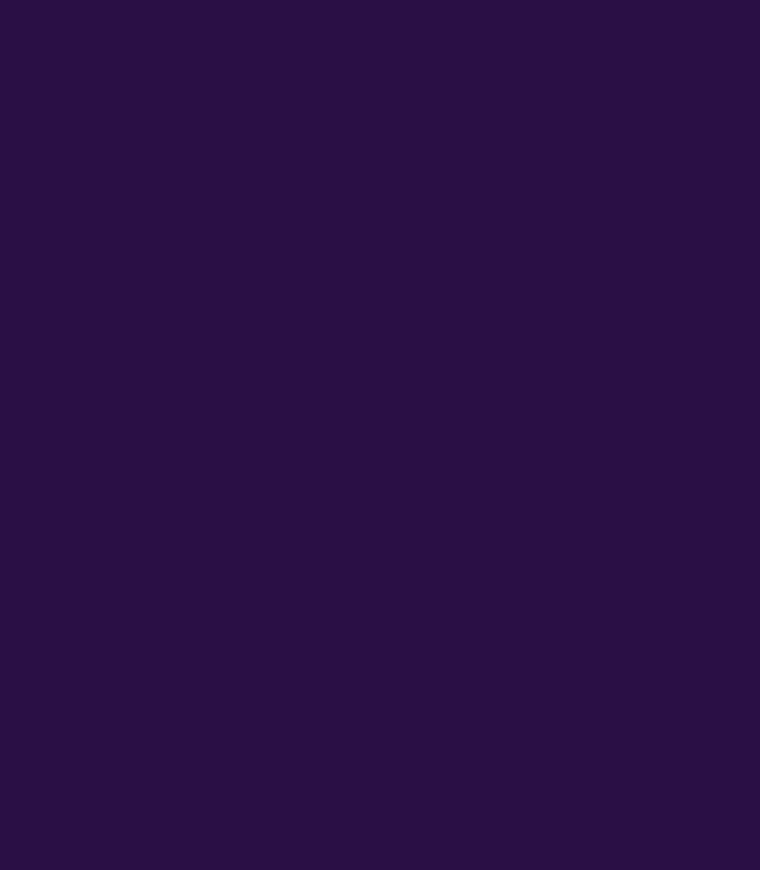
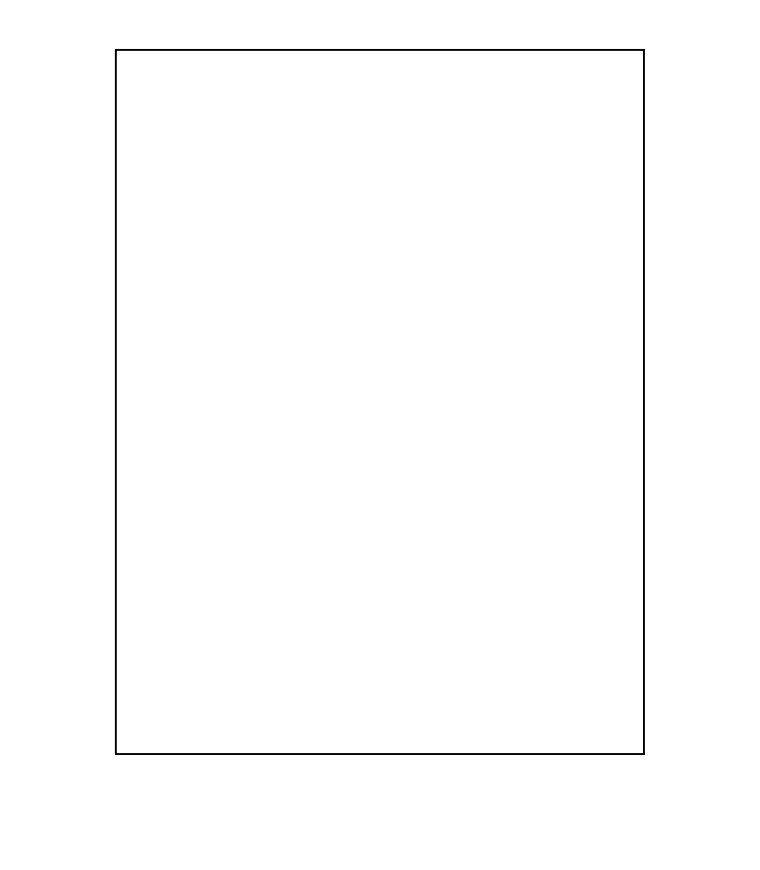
board edge: none -> (115, 49) (643, 49) (643, 754) (115, 754) (115, 49)

